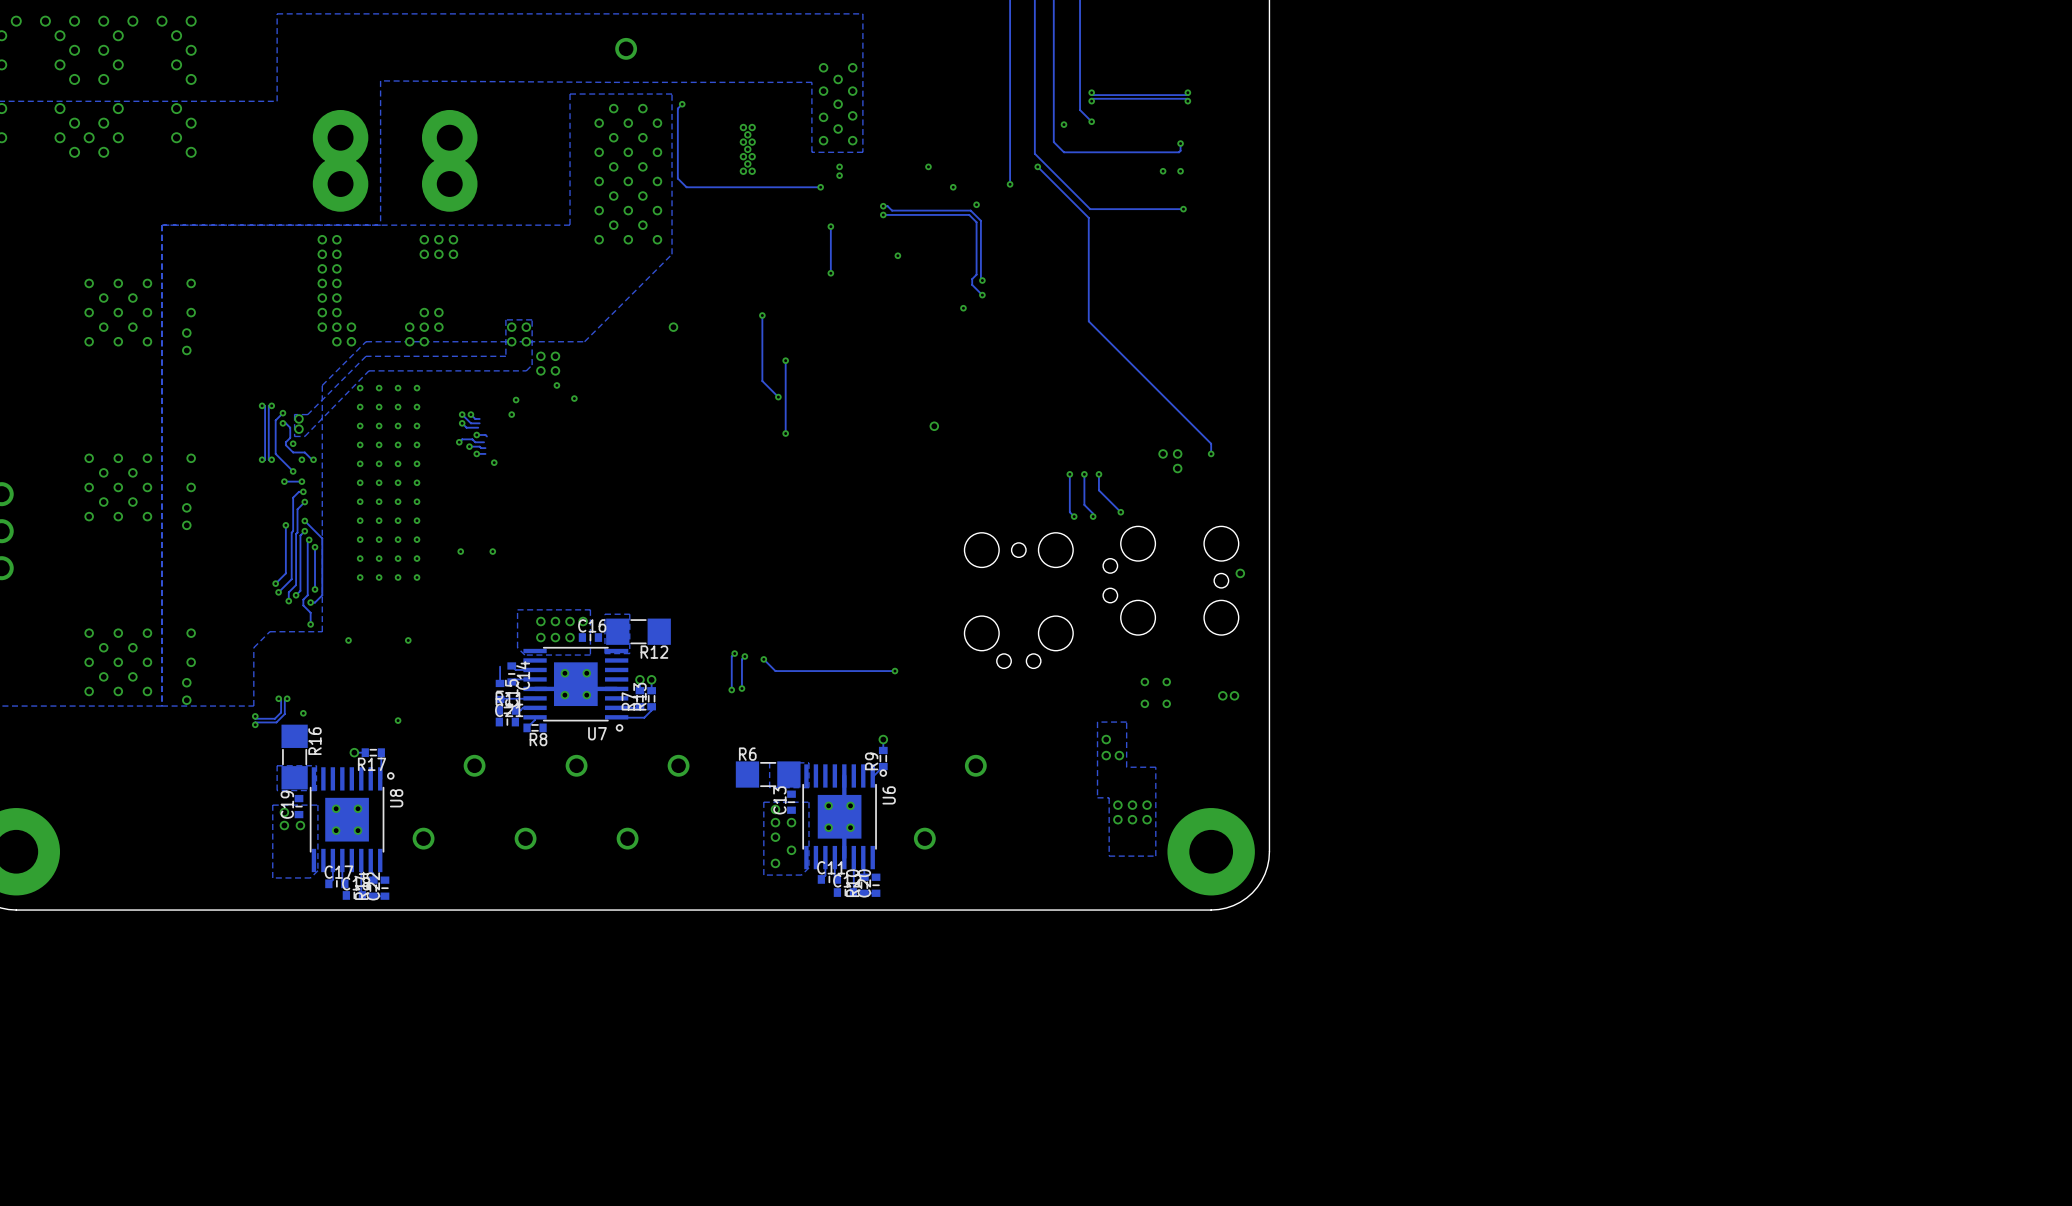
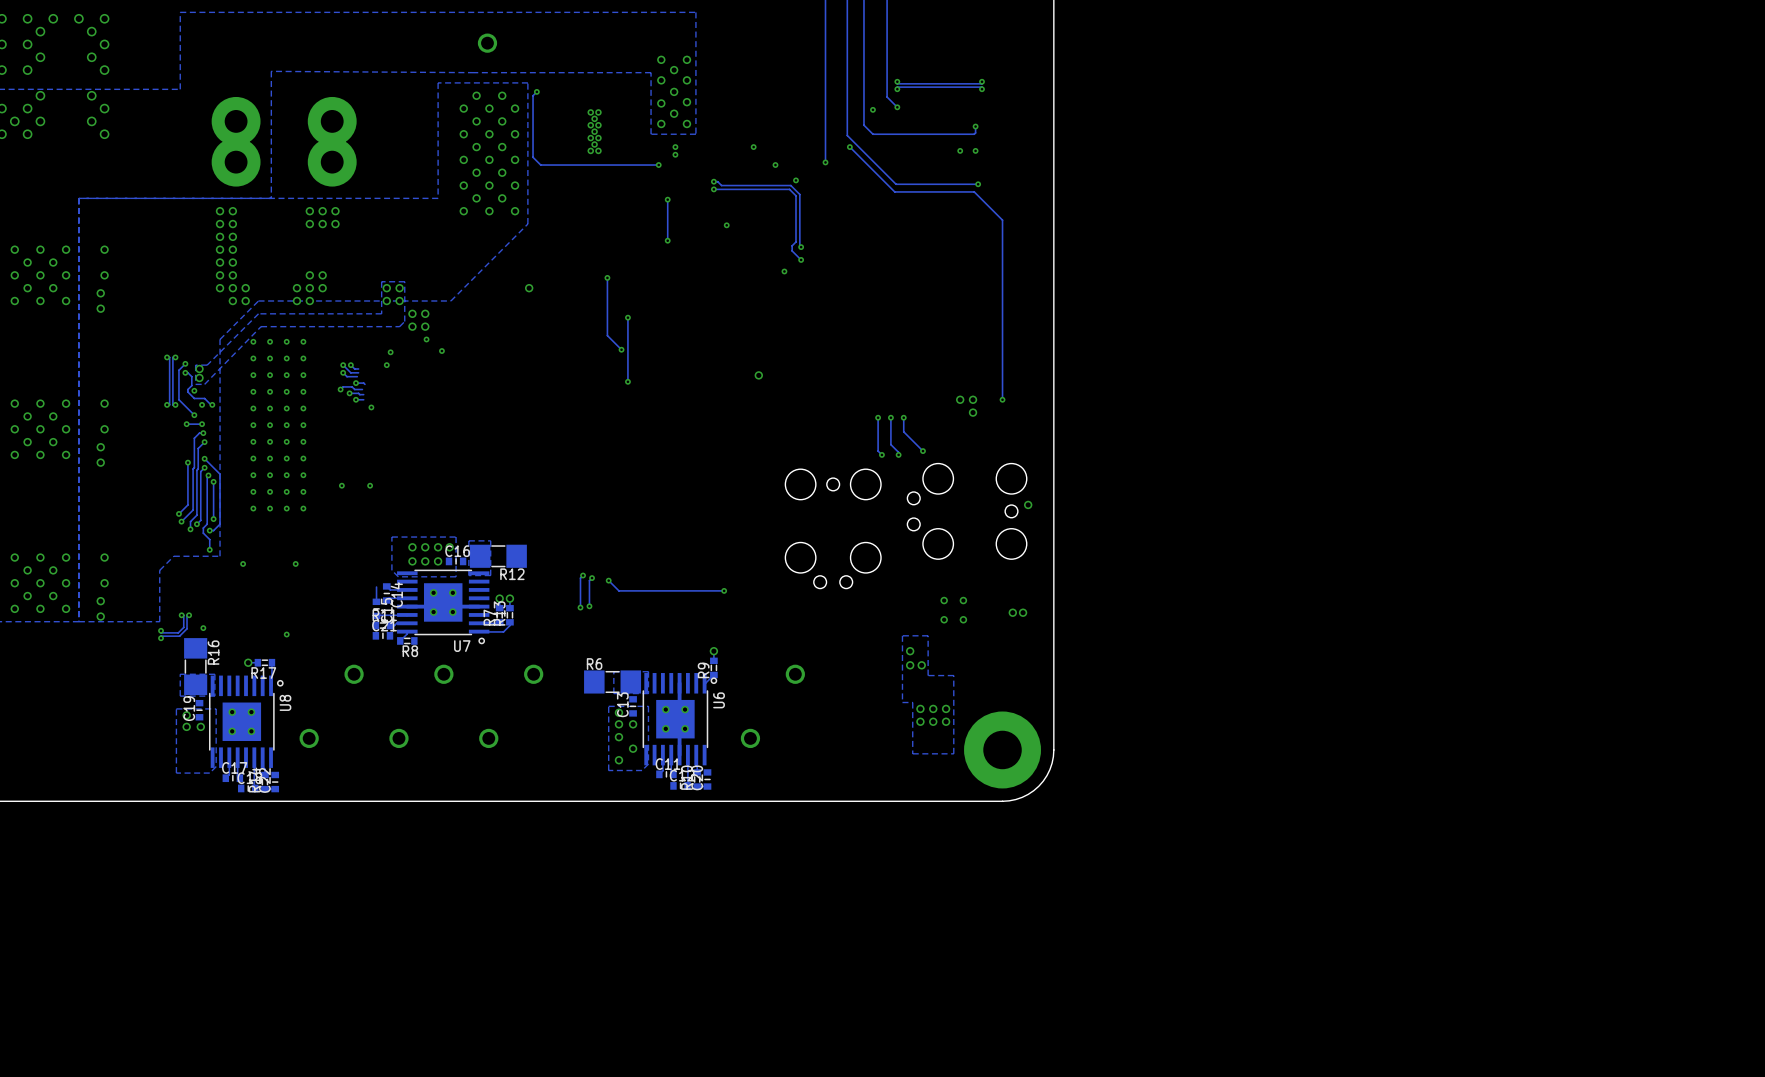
track: (1088, 217) (1088, 321) (1211, 443) -> (894, 191) (974, 191) (1002, 220) (1002, 390)

